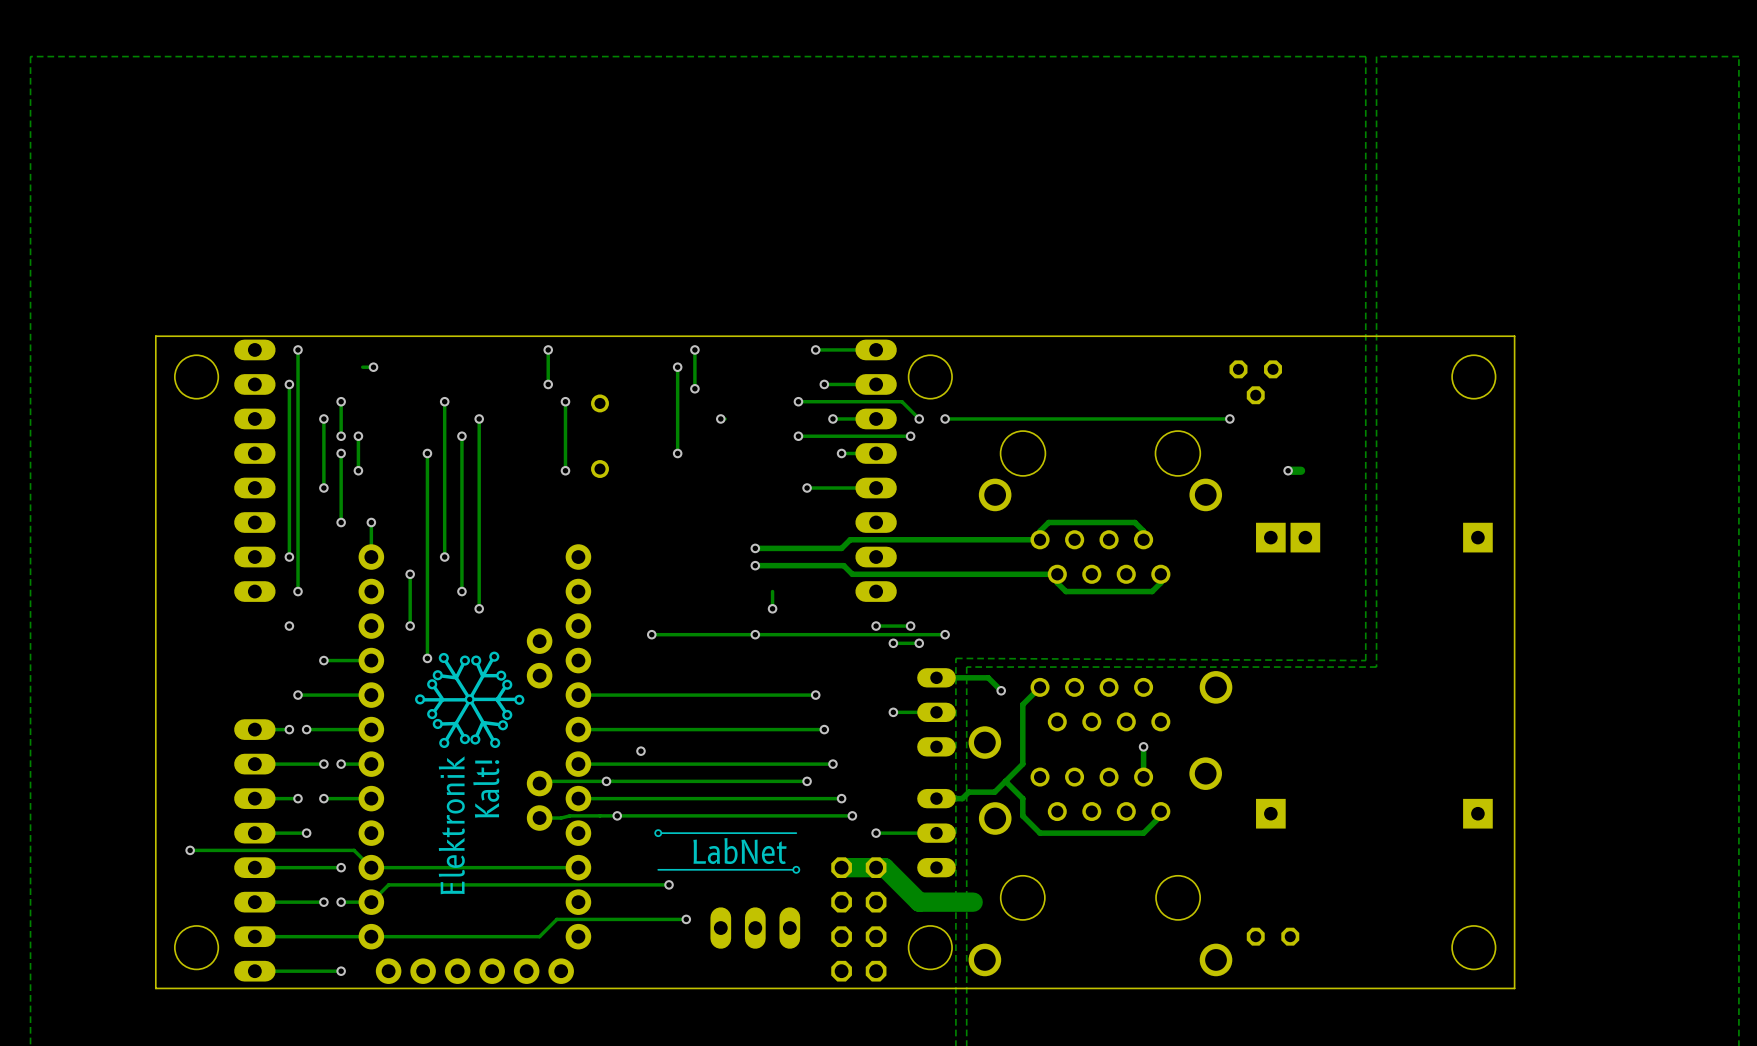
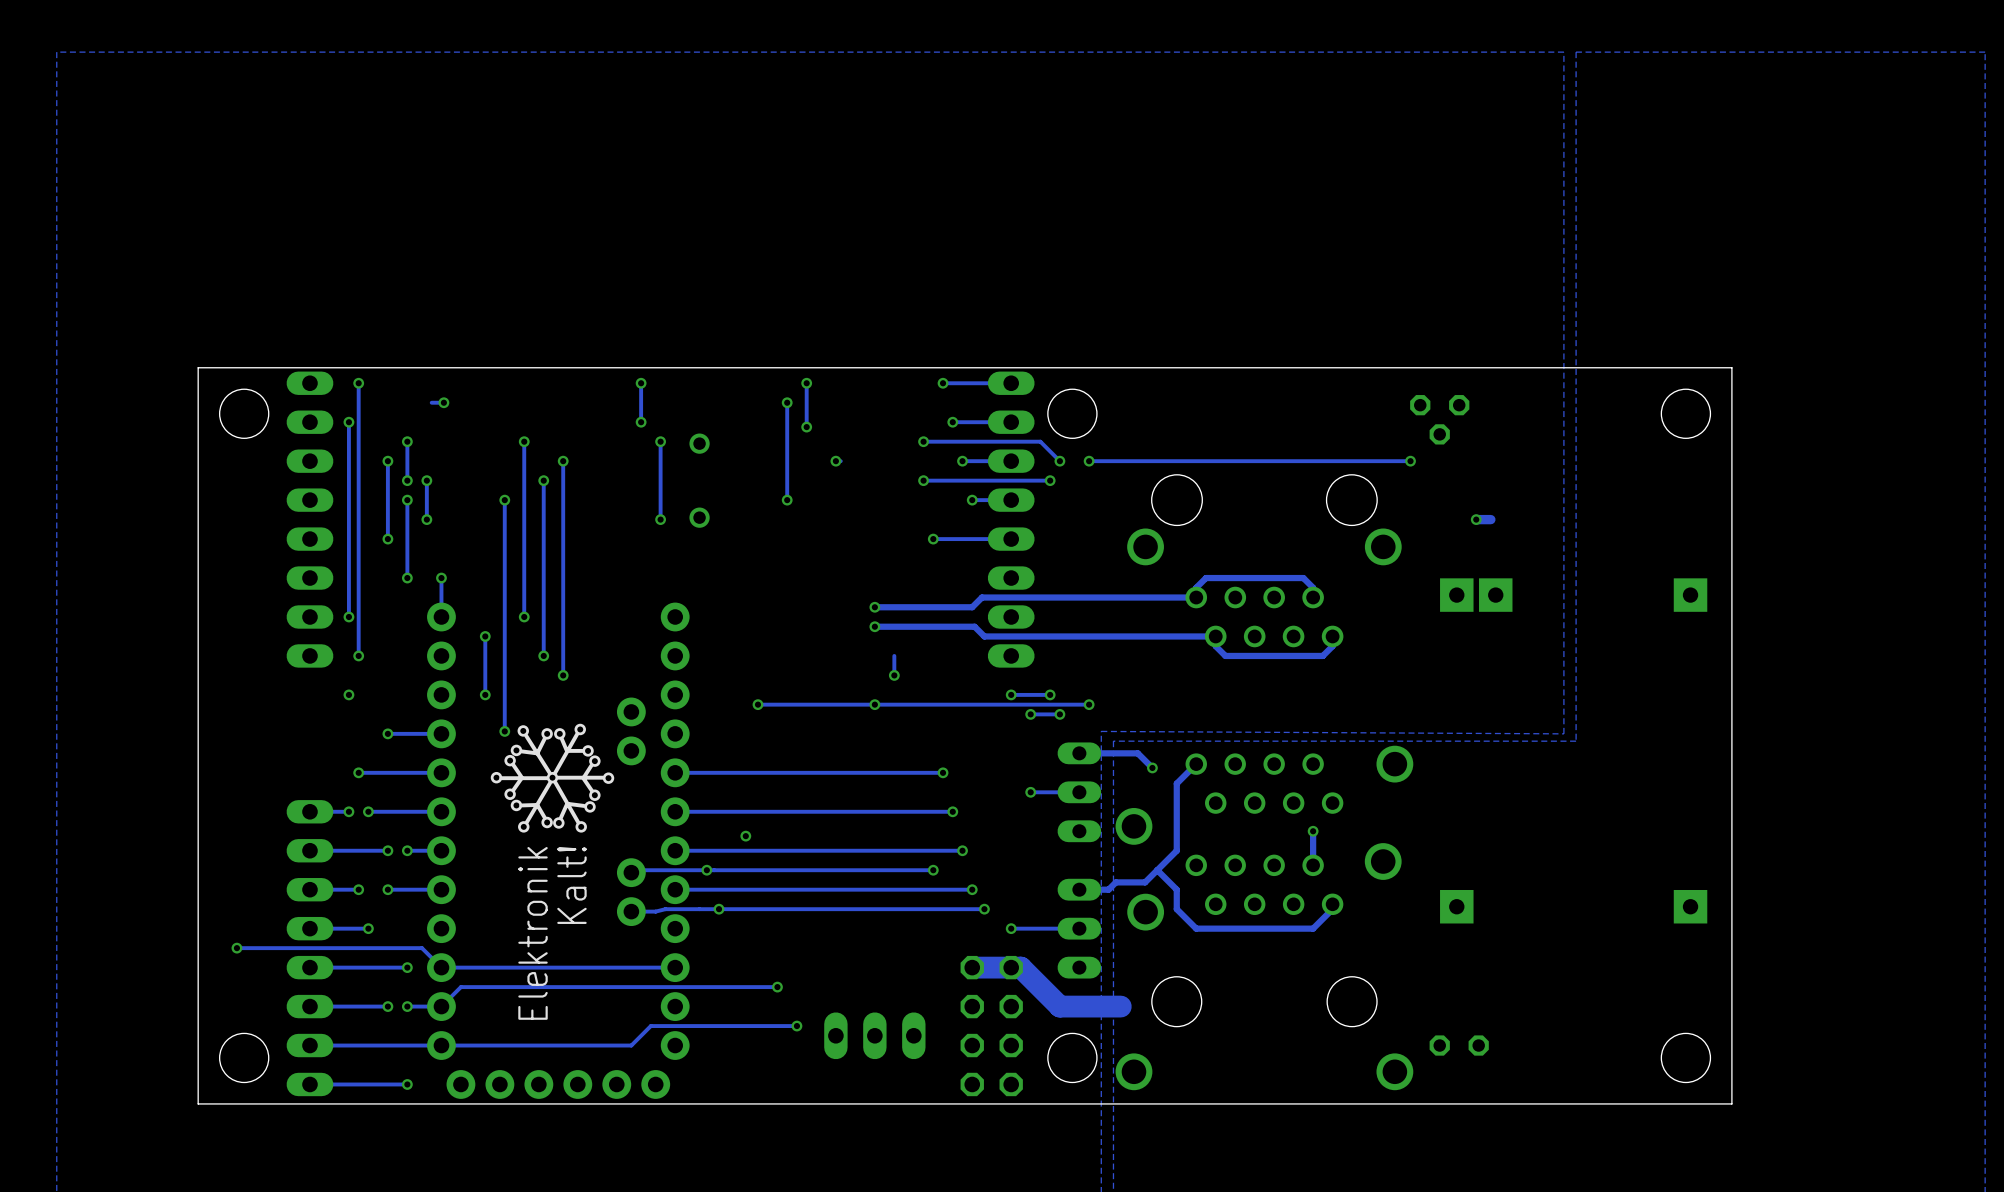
drawing: [654, 829, 801, 874] -> none

